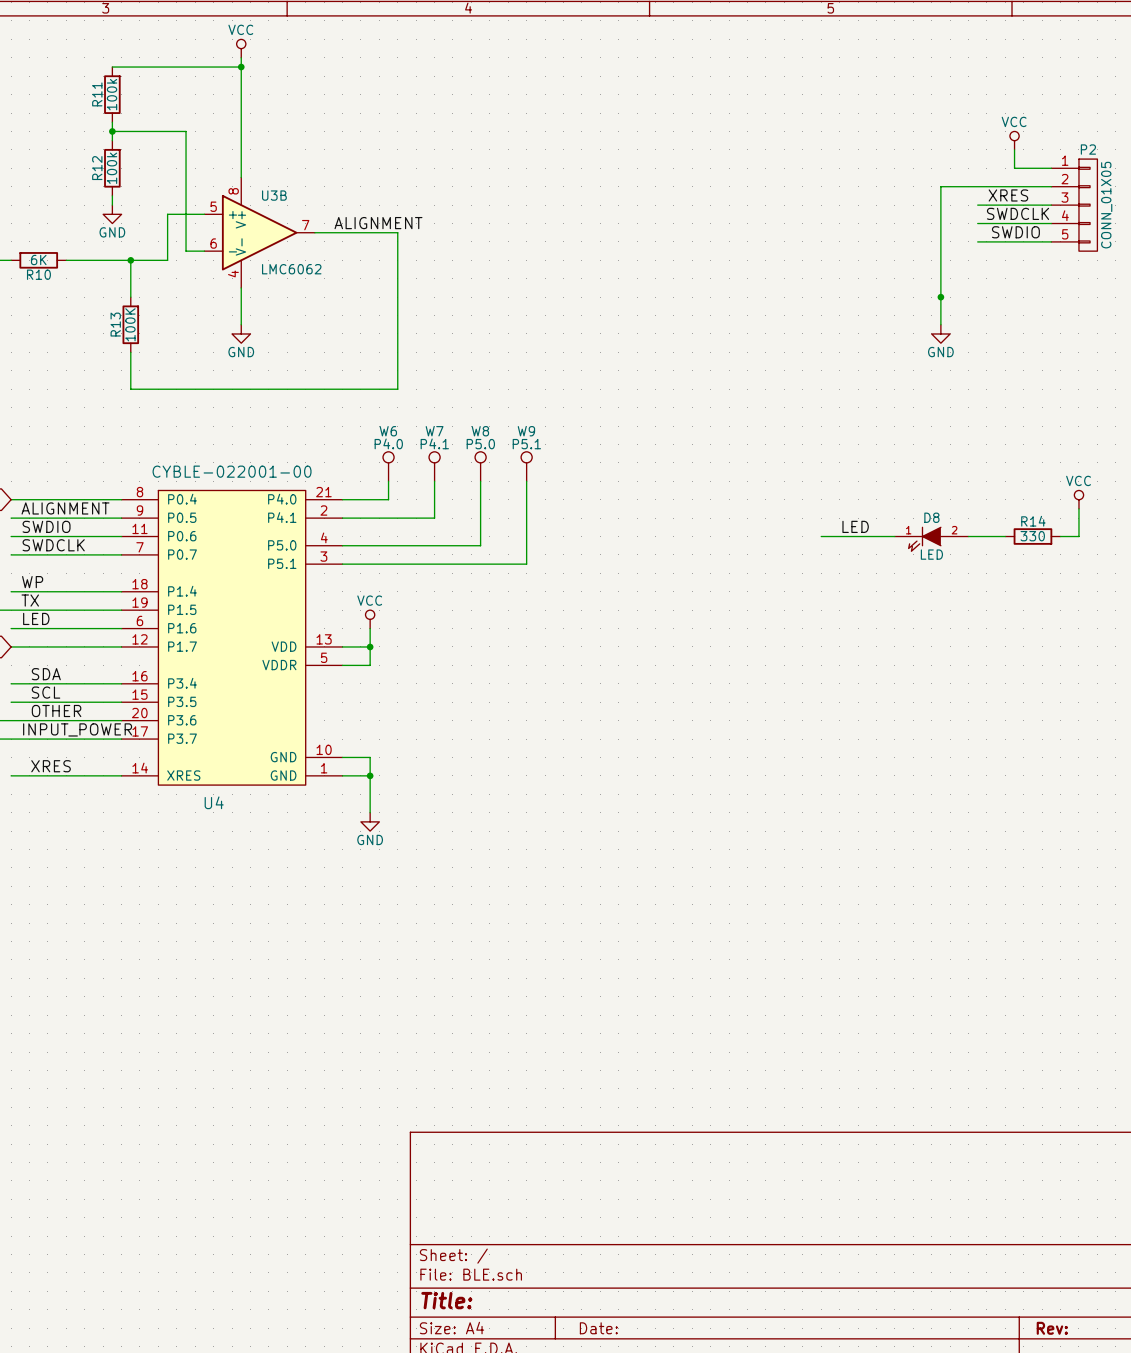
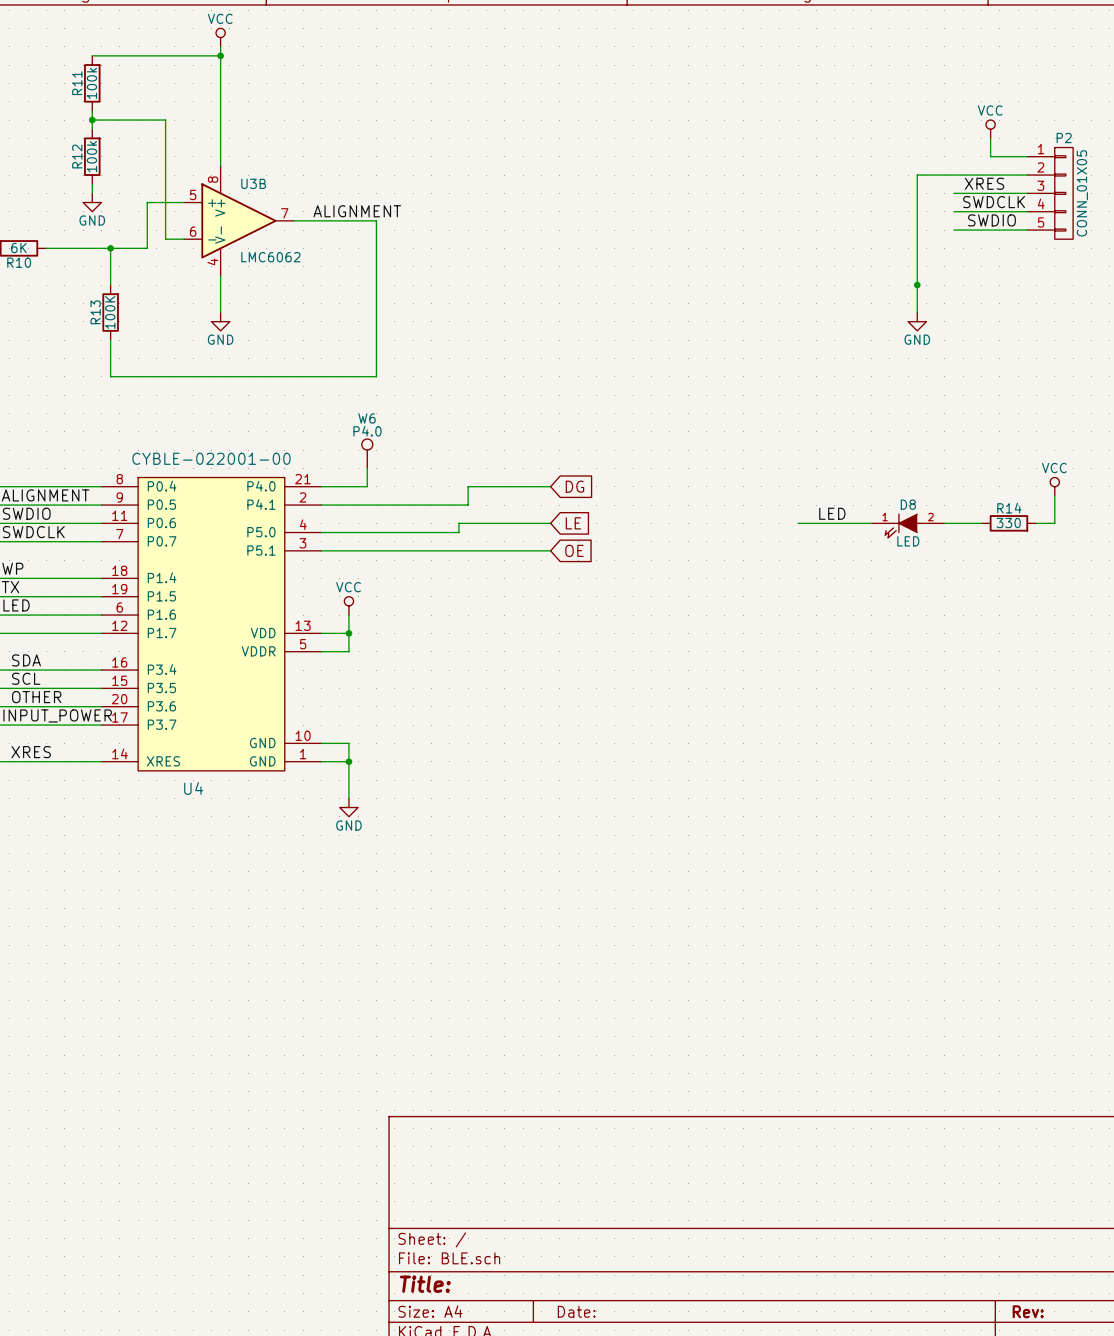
W7: P4.1 (434, 466) -> none
W8: P5.0 (480, 466) -> none
W9: P5.1 (526, 466) -> none
wire: (434, 481) (434, 518) -> (550, 486) (468, 486) (468, 505) (413, 505)
wire: (480, 481) (480, 536) -> (550, 523) (458, 523)
wire: (526, 481) (526, 564) -> (550, 550) (504, 550)
global label: none -> DG (574, 486)
global label: none -> LE (573, 523)
global label: none -> OE (574, 550)

